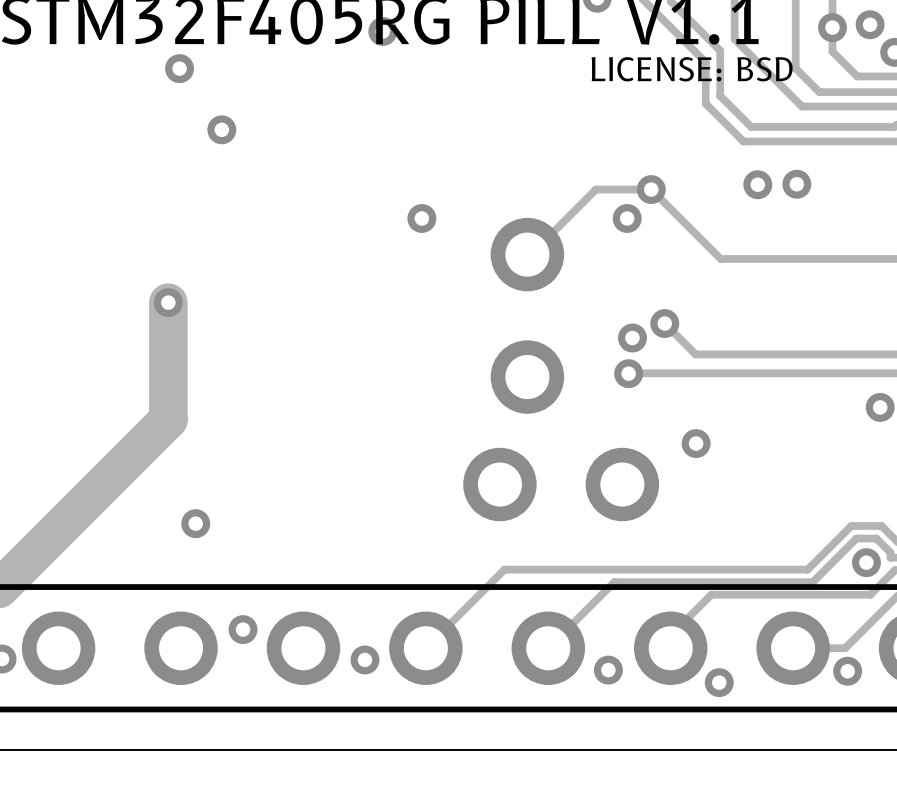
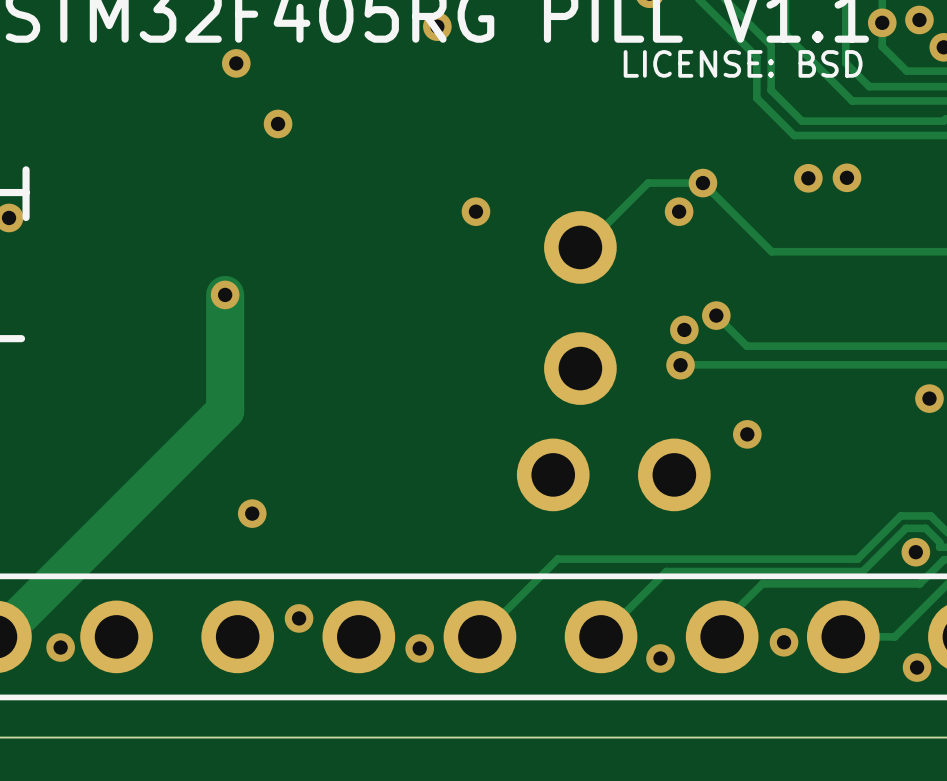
via position: (847, 671) -> (917, 667)
via position: (719, 682) -> (784, 642)

